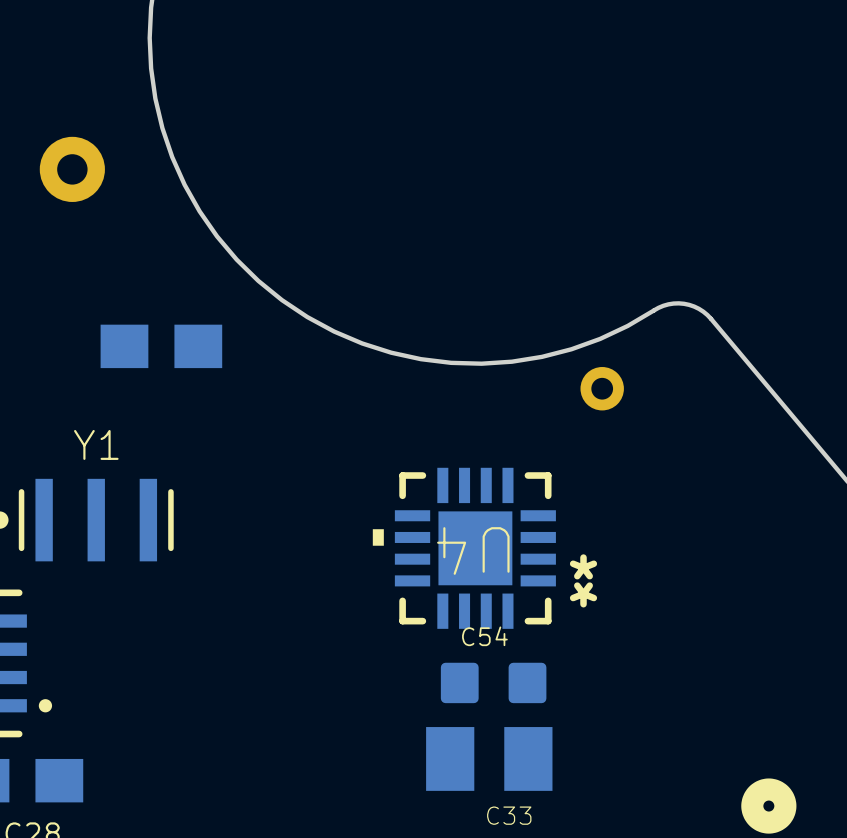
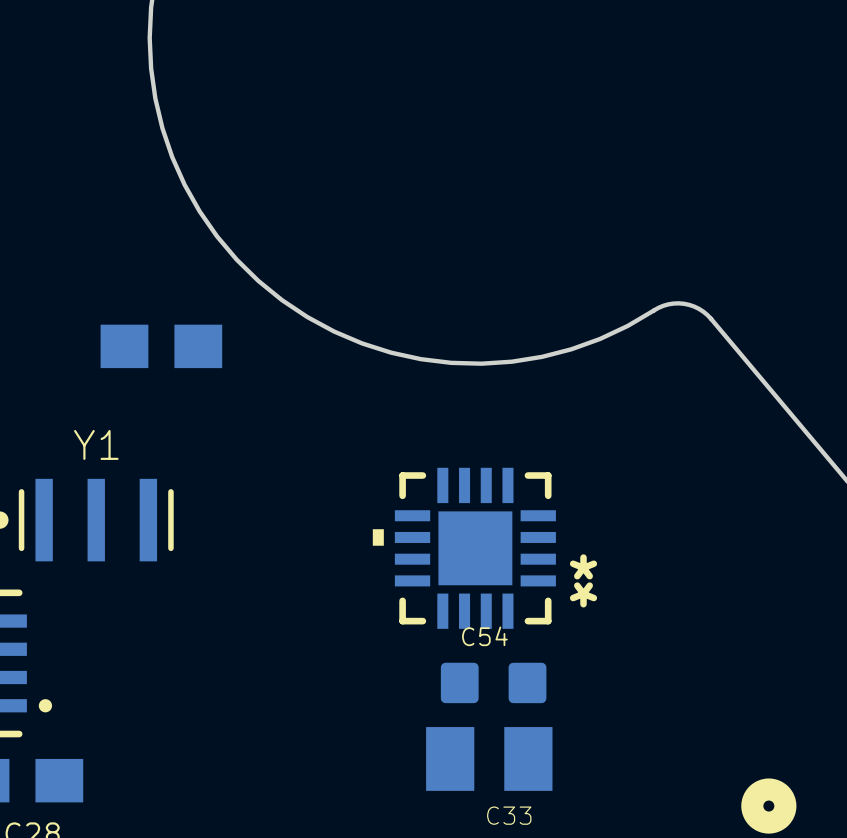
part: (72, 169) -> none
part: (602, 388) -> none
U4 name: U4 (473, 550) -> none

